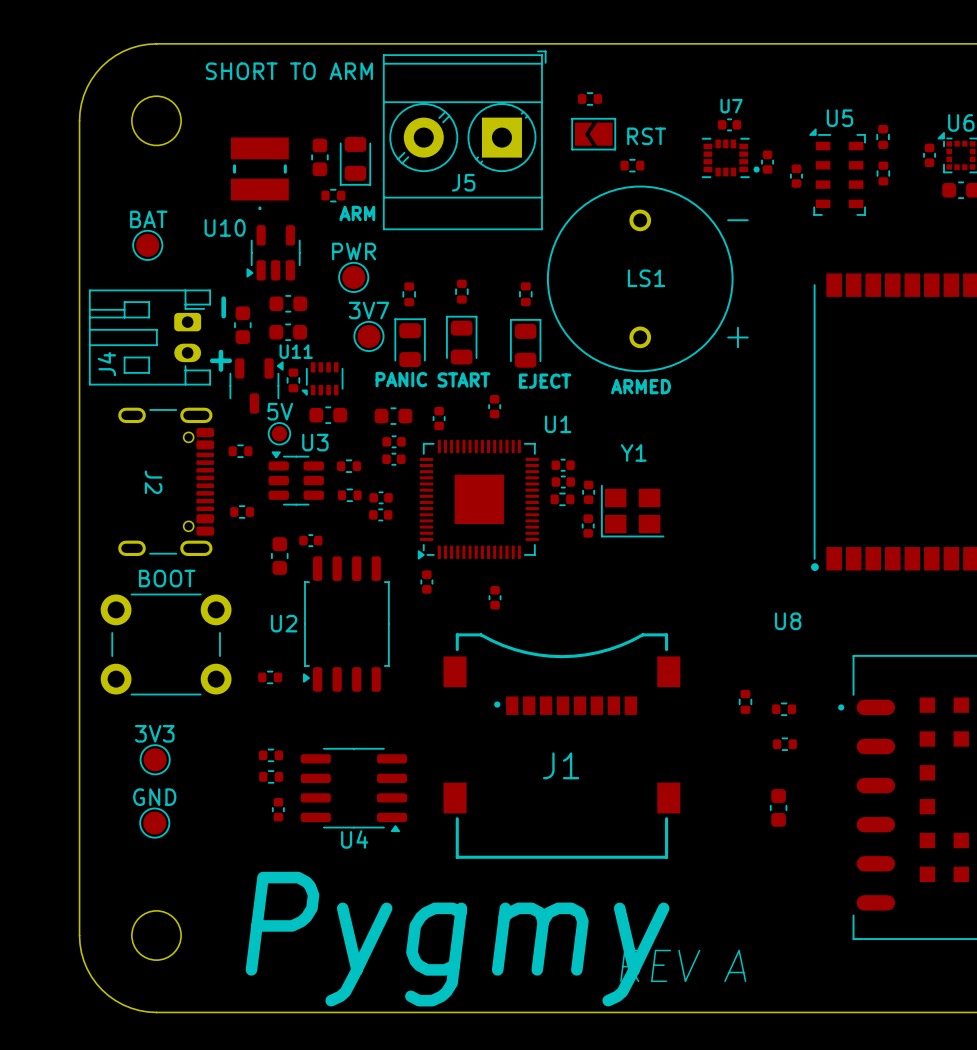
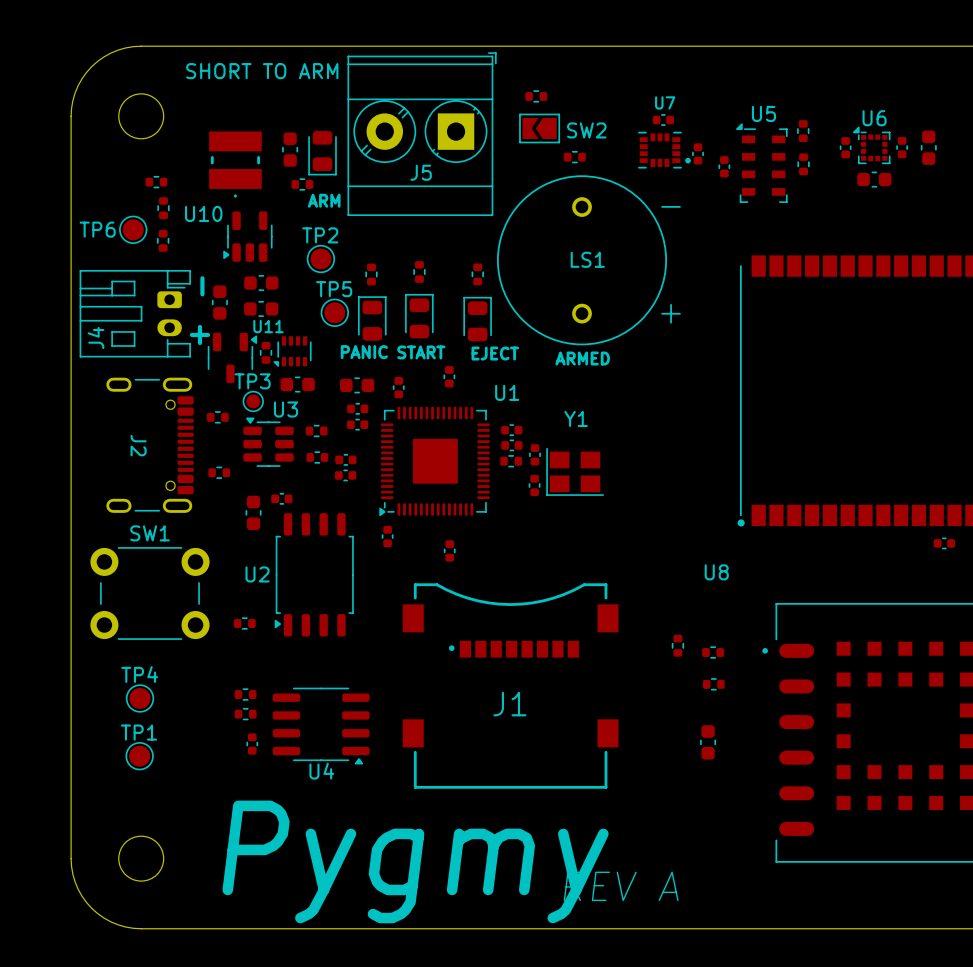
RST name: RST (646, 136) -> SW2 (586, 130)
part: none -> (156, 182)
BAT name: BAT (148, 219) -> TP6 (97, 229)
part: none -> (163, 208)
PWR name: PWR (354, 251) -> TP2 (320, 235)
part: none -> (163, 240)
3V7 name: 3V7 (368, 310) -> TP5 (334, 289)
5V name: 5V (280, 411) -> TP3 (252, 381)
BOOT name: BOOT (167, 578) -> SW1 (149, 533)
3V3 name: 3V3 (154, 733) -> TP4 (139, 674)
GND name: GND (154, 797) -> TP1 (138, 732)

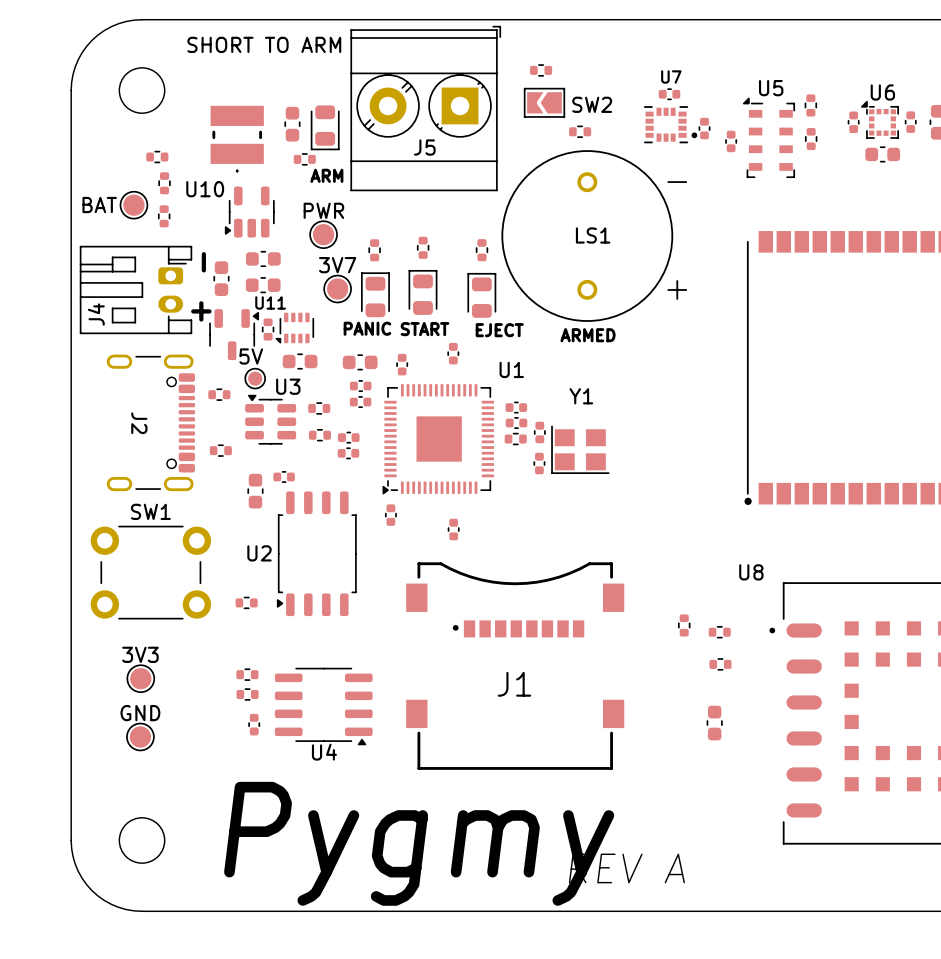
TP6 name: TP6 (97, 229) -> BAT (99, 205)
TP2 name: TP2 (320, 235) -> PWR (323, 210)
TP5 name: TP5 (334, 289) -> 3V7 (337, 265)
TP3 name: TP3 (252, 381) -> 5V (251, 356)
U8 name position: U8 (716, 572) -> U8 (751, 572)
TP4 name: TP4 (139, 674) -> 3V3 (140, 654)
TP1 name: TP1 (138, 732) -> GND (140, 713)

